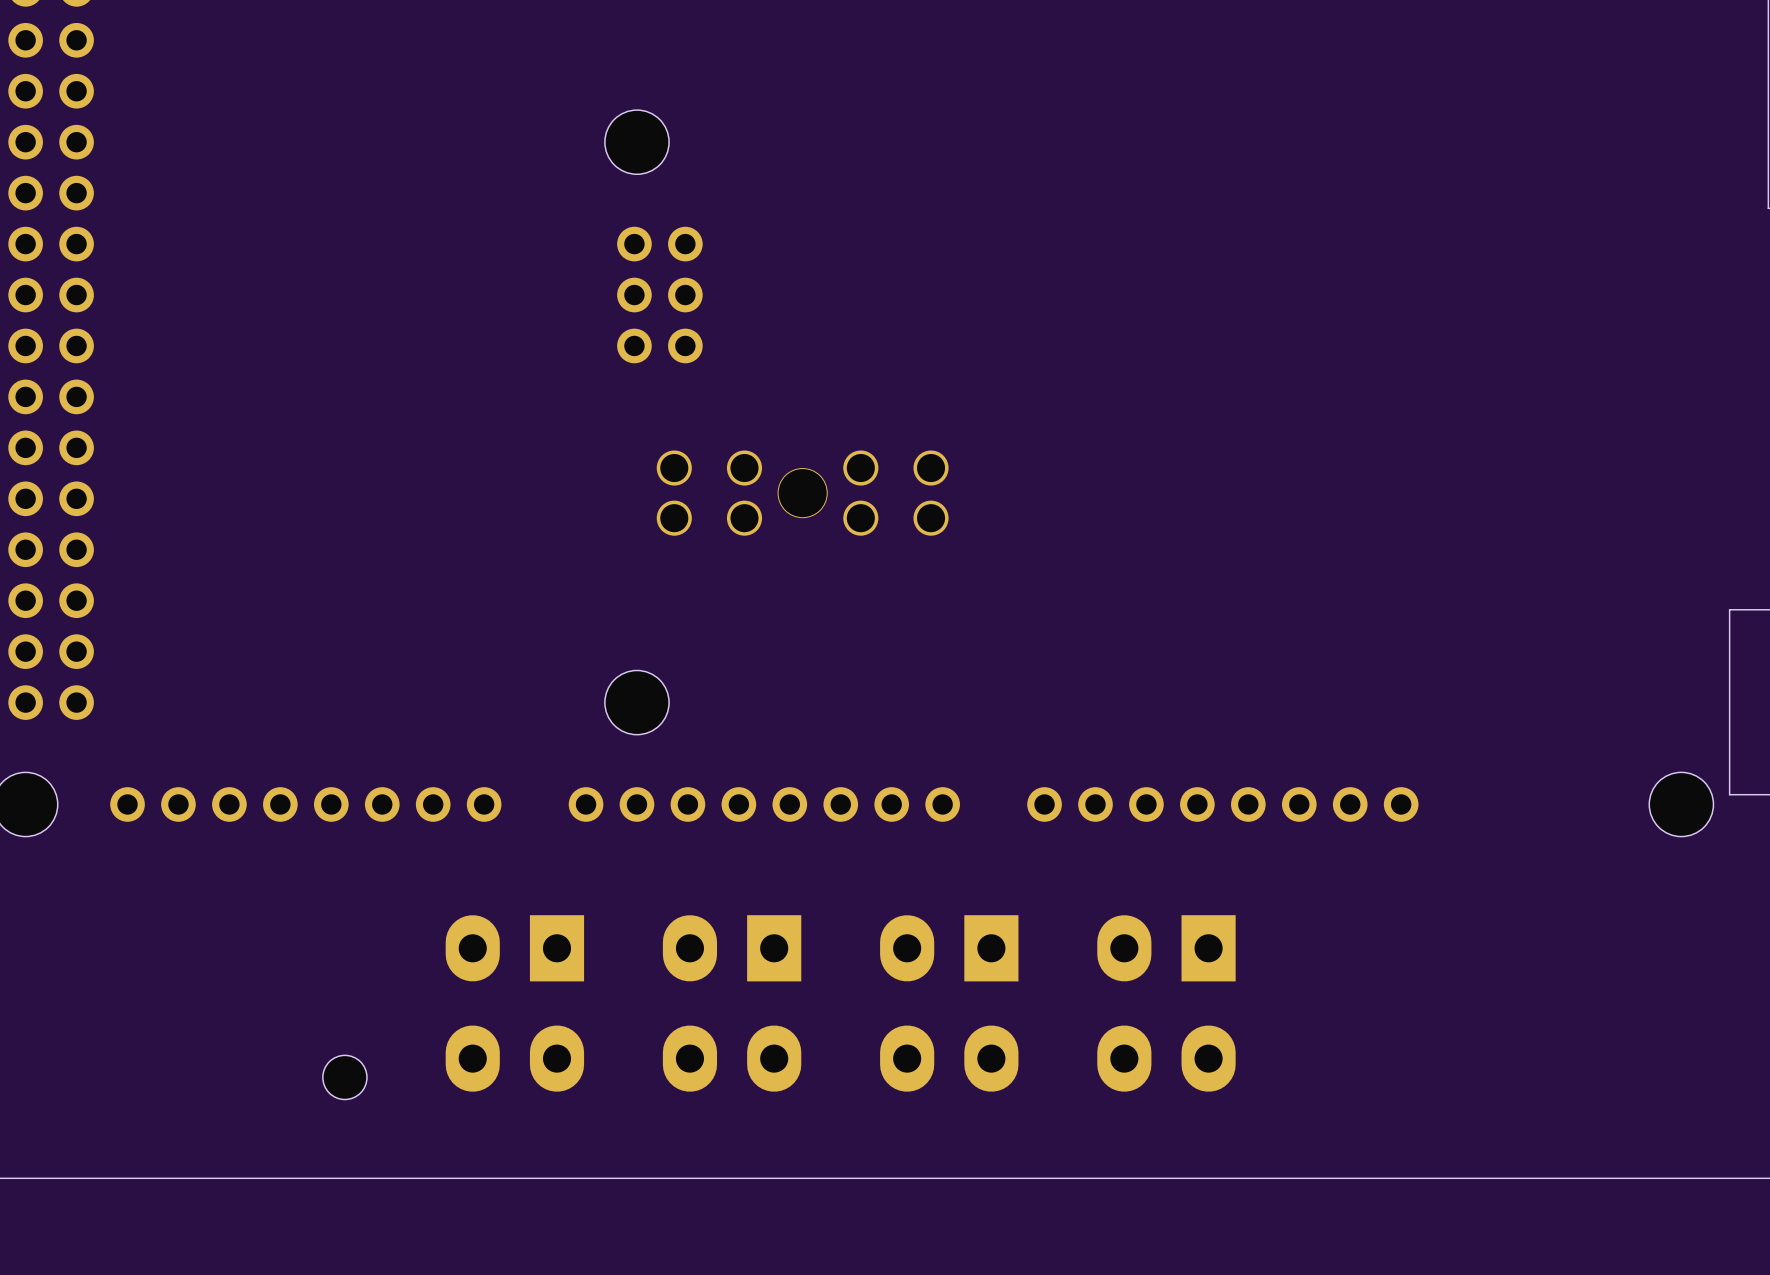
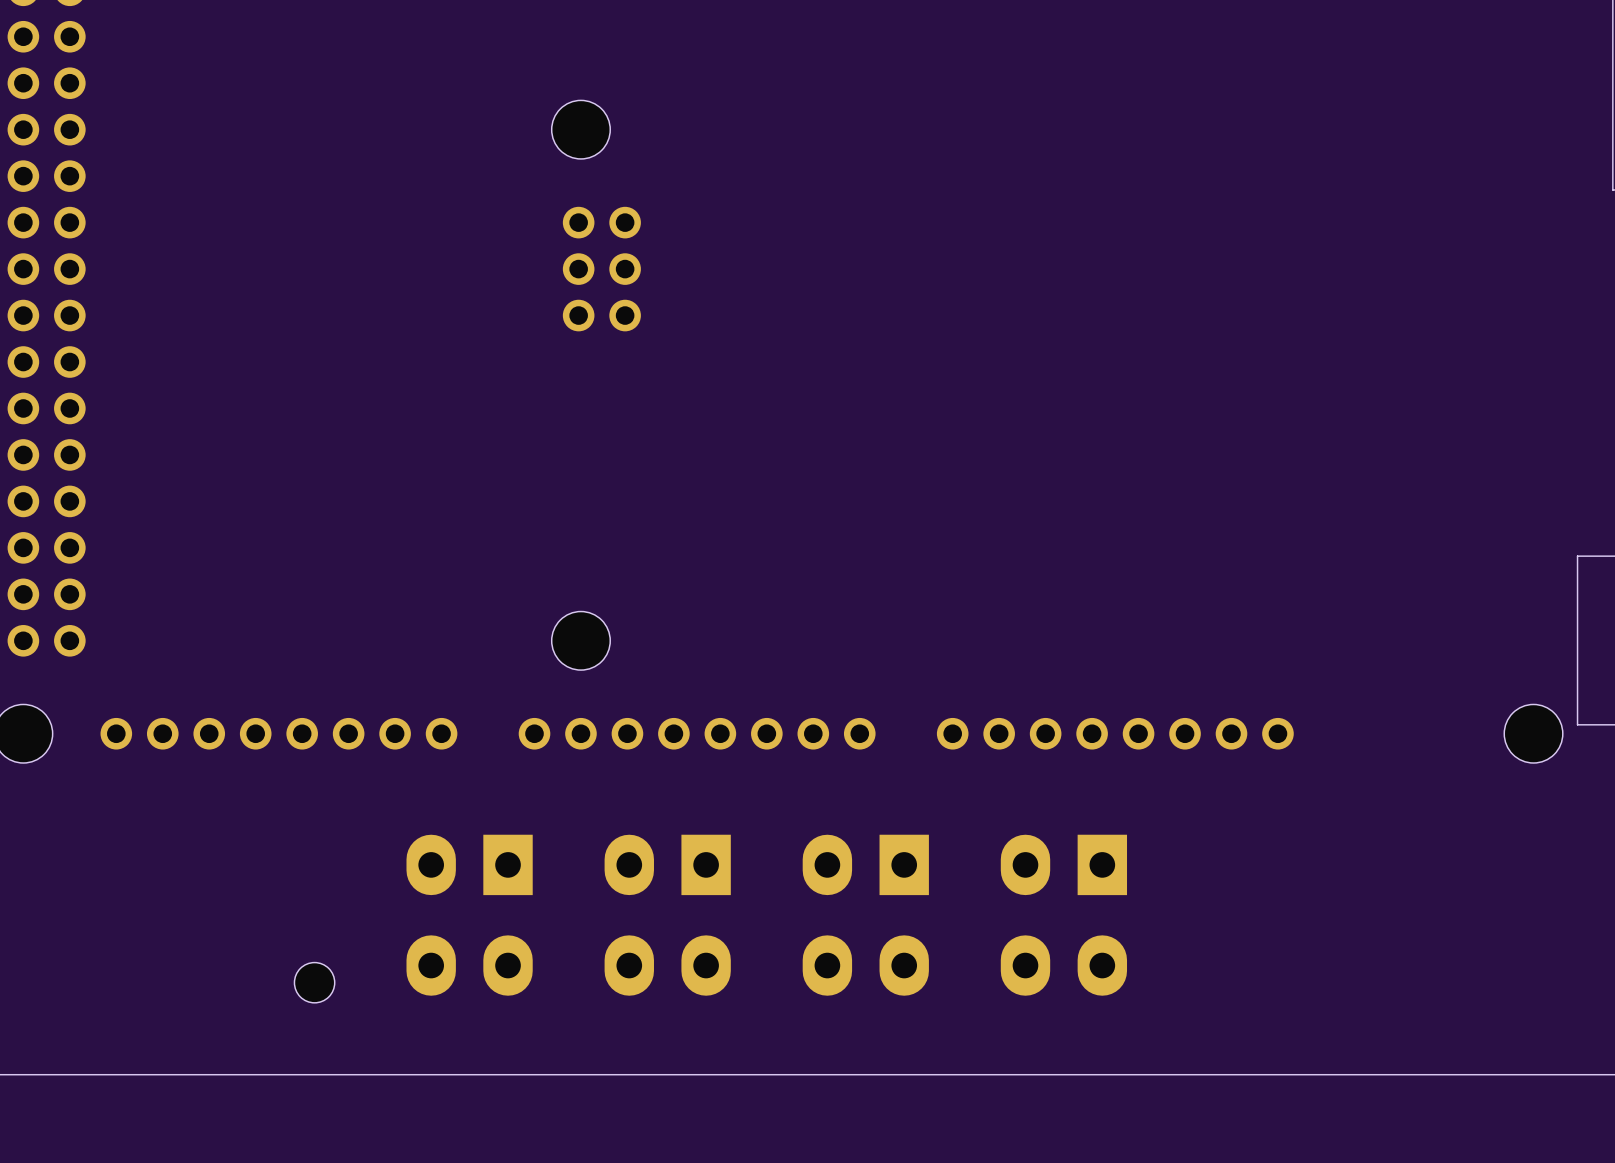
part: (802, 493) -> none

